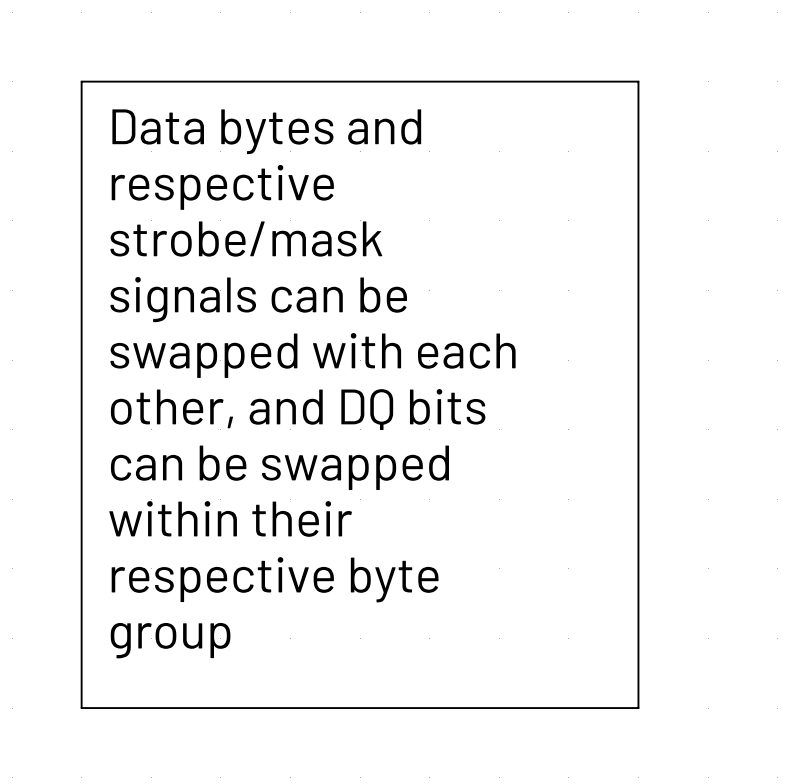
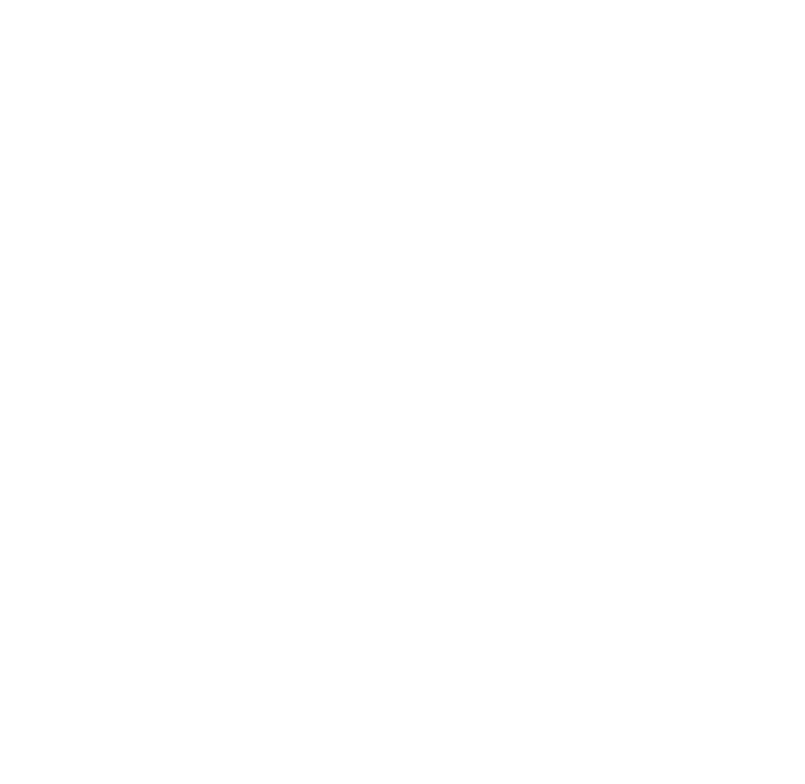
line: (81, 81) (638, 81) (638, 708) (81, 708) (81, 81) -> none
text: Data bytes and (266, 131) -> none
text: respective (222, 187) -> none
text: strobe/mask (246, 239) -> none
text: signals can be (258, 299) -> none
text: swapped with each (313, 355) -> none
text: other, and DQ bits (298, 409) -> none
text: can be swapped (279, 467) -> none
text: within their (230, 518) -> none
text: respective byte (275, 579) -> none
text: group (170, 640) -> none

